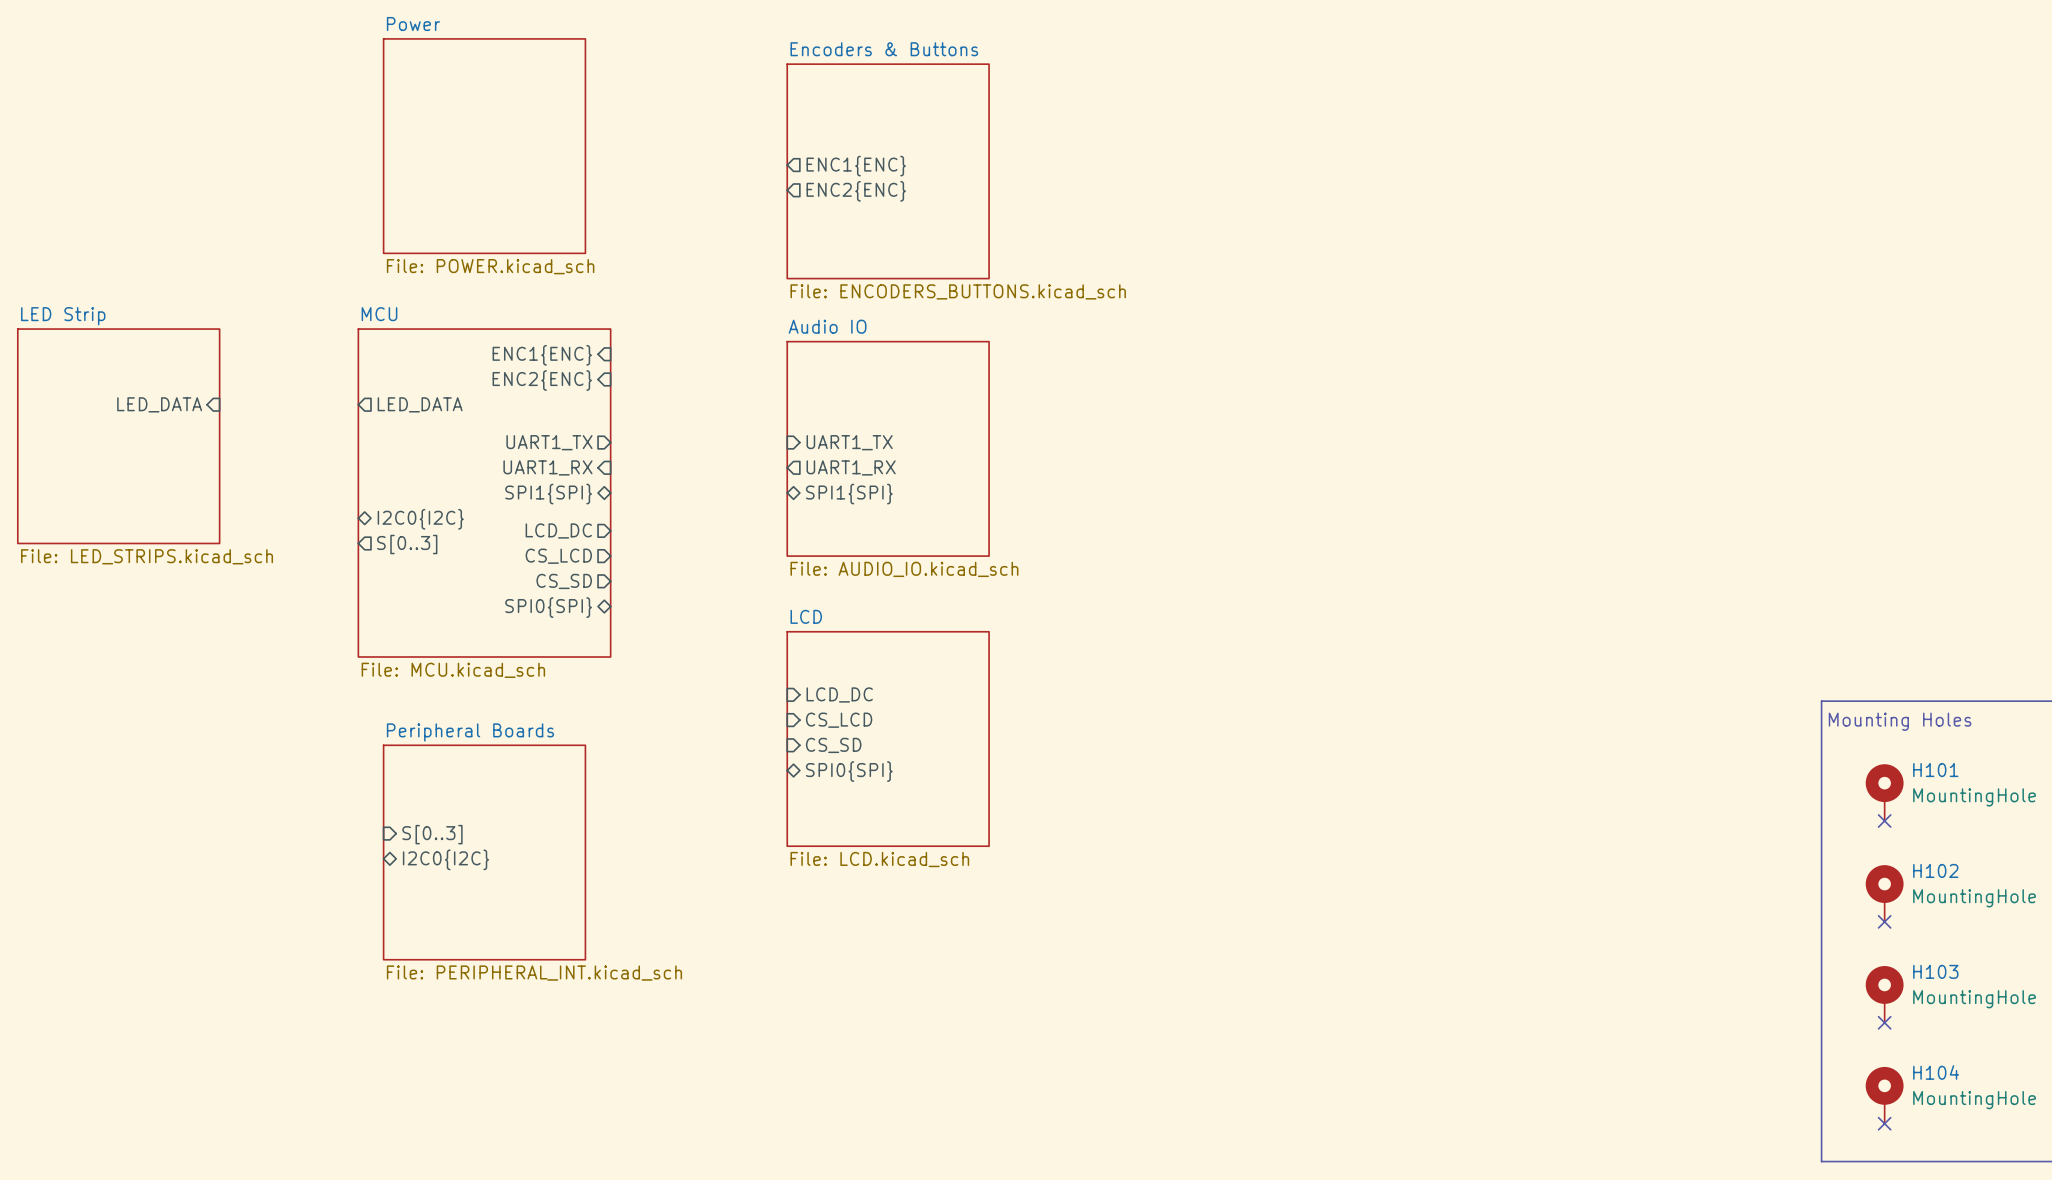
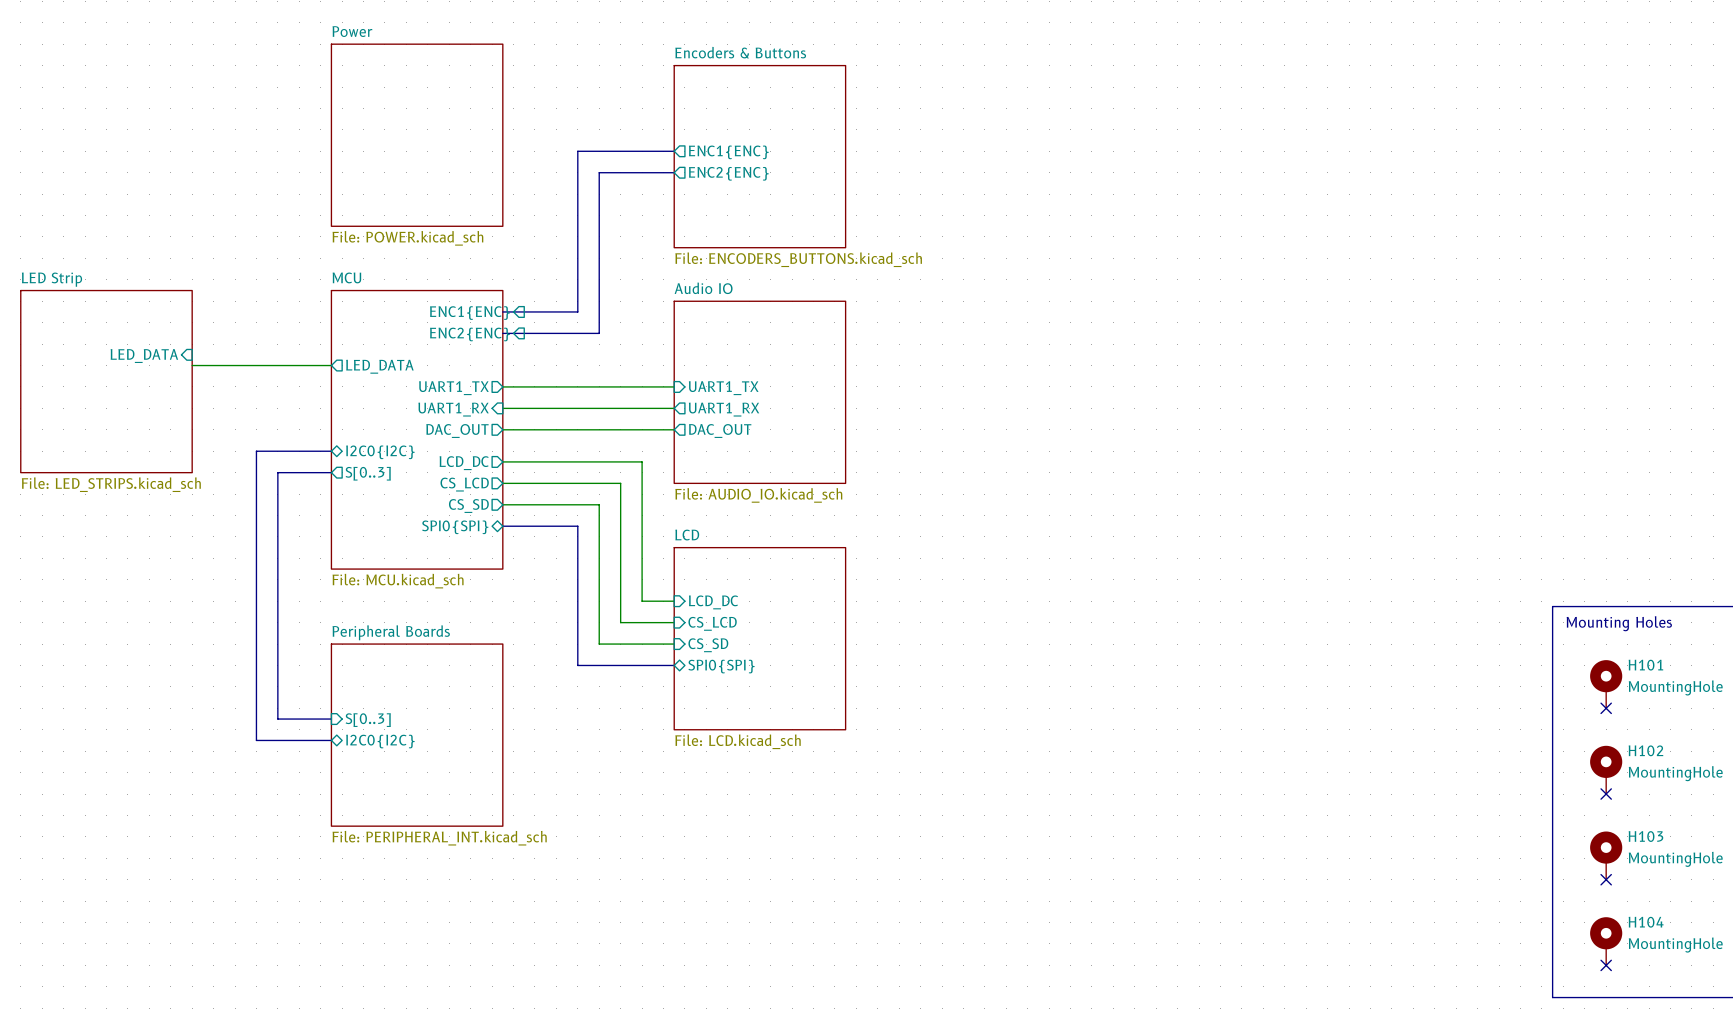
bus: none -> (674, 151) (577, 151) (577, 311) (502, 311)
bus: none -> (674, 172) (599, 172) (599, 333) (502, 333)
sheet MCU name position: MCU (379, 314) -> MCU (346, 277)
sheet MCU shape: [357, 328, 612, 658] -> [330, 289, 504, 570]
sheet pin position: LED_DATA (420, 404) -> LED_DATA (379, 366)
wire: none -> (192, 365) (331, 365)
sheet pin position: UART1_TX (549, 442) -> UART1_TX (453, 388)
wire: none -> (502, 386) (674, 386)
sheet pin position: UART1_RX (547, 467) -> UART1_RX (453, 409)
wire: none -> (502, 408) (674, 408)
sheet pin: none -> DAC_OUT (457, 431)
wire: none -> (502, 429) (674, 429)
sheet pin: SPI1{SPI} (548, 494) -> none
sheet pin shape: bidirectional (849, 494) -> output (720, 431)
sheet pin: SPI1{SPI} (849, 494) -> DAC_OUT (720, 431)
bus: none -> (331, 451) (256, 451) (256, 740) (331, 740)
sheet pin position: I2C0{I2C} (420, 519) -> I2C0{I2C} (380, 452)
sheet pin position: LCD_DC (558, 530) -> LCD_DC (464, 463)
wire: none -> (502, 461) (642, 461) (642, 601) (674, 601)
bus: none -> (331, 472) (277, 472) (277, 719) (331, 719)
sheet pin position: S[0..3] (407, 544) -> S[0..3] (368, 473)
sheet pin position: CS_LCD (558, 556) -> CS_LCD (464, 484)
wire: none -> (502, 483) (620, 483) (620, 622) (674, 622)
sheet pin position: CS_SD (564, 581) -> CS_SD (468, 506)
wire: none -> (502, 504) (599, 504) (599, 644) (674, 644)
bus: none -> (502, 526) (577, 526) (577, 665) (674, 665)
sheet pin position: SPI0{SPI} (548, 607) -> SPI0{SPI} (455, 527)
sheet MCU value position: File: MCU.kicad_sch (453, 670) -> File: MCU.kicad_sch (398, 581)

